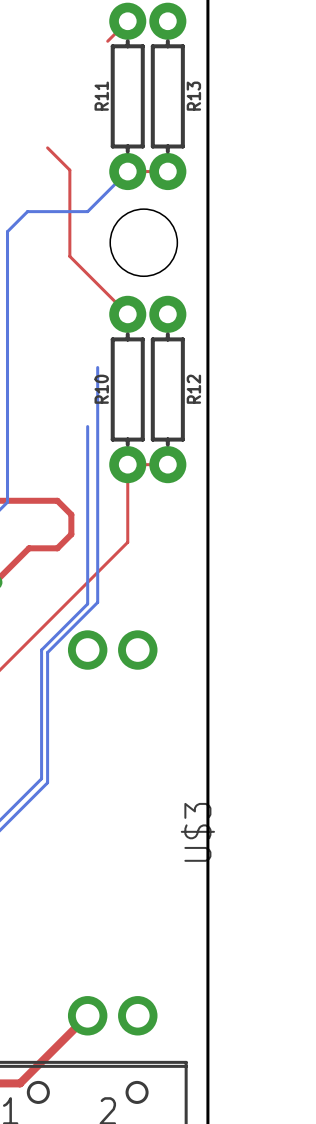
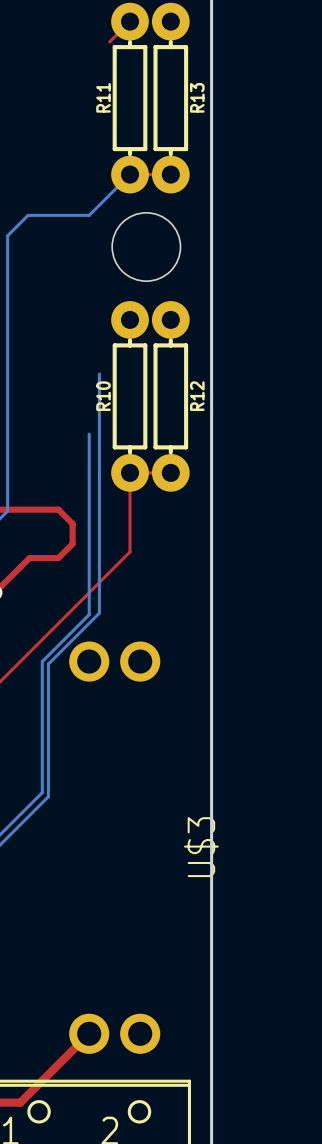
top track: (47, 147) (69, 170) (69, 256) (127, 314) -> none

